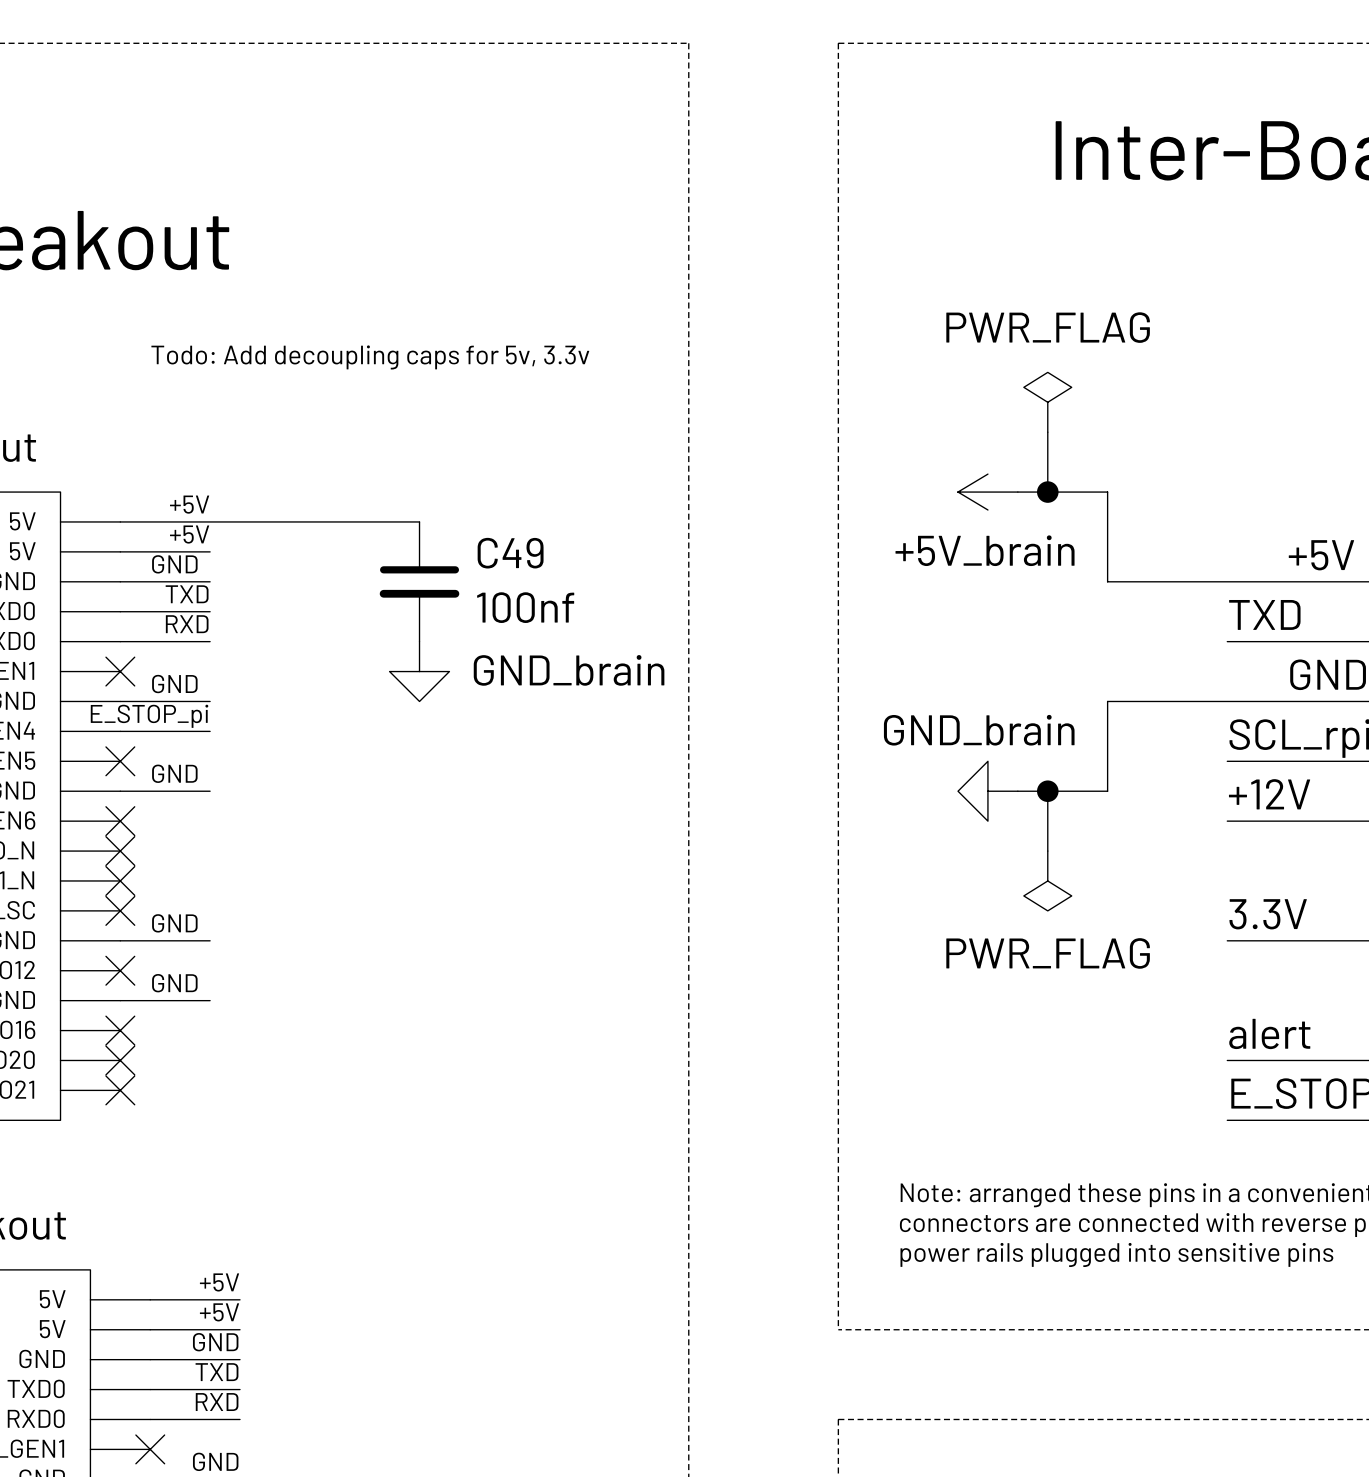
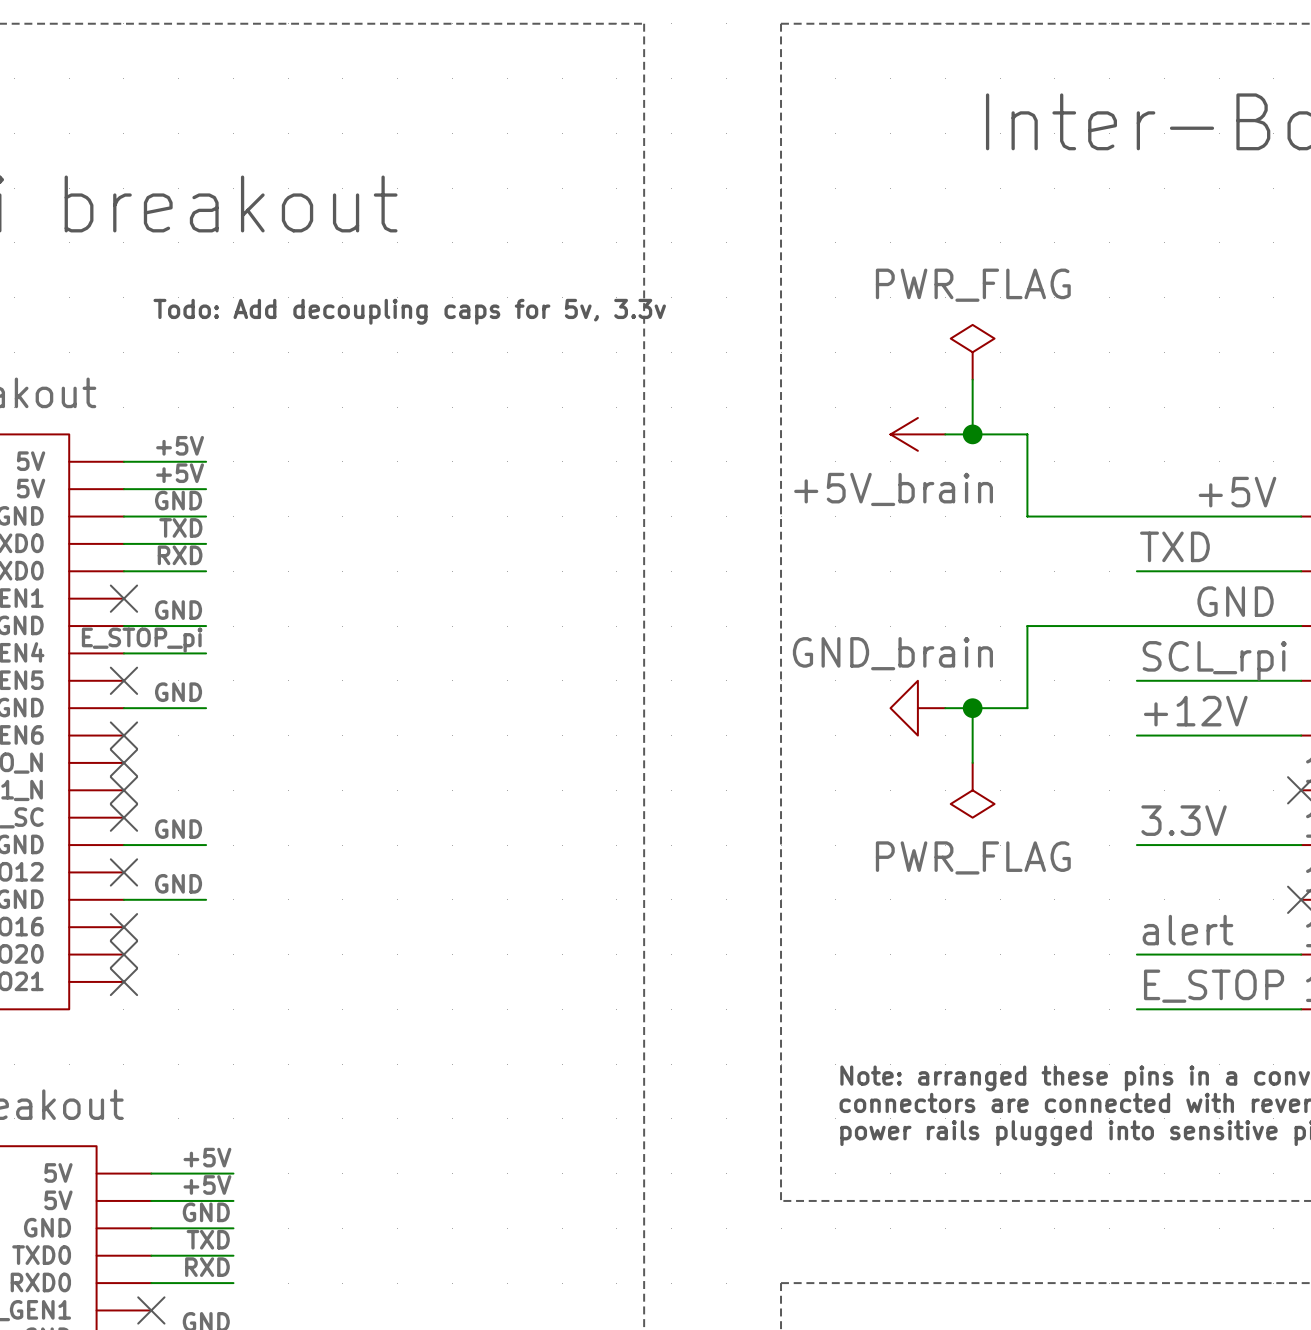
wire: (210, 521) (419, 521) -> none
C49: 100nf (419, 581) -> none
power symbol: GND_brain (419, 671) -> none

